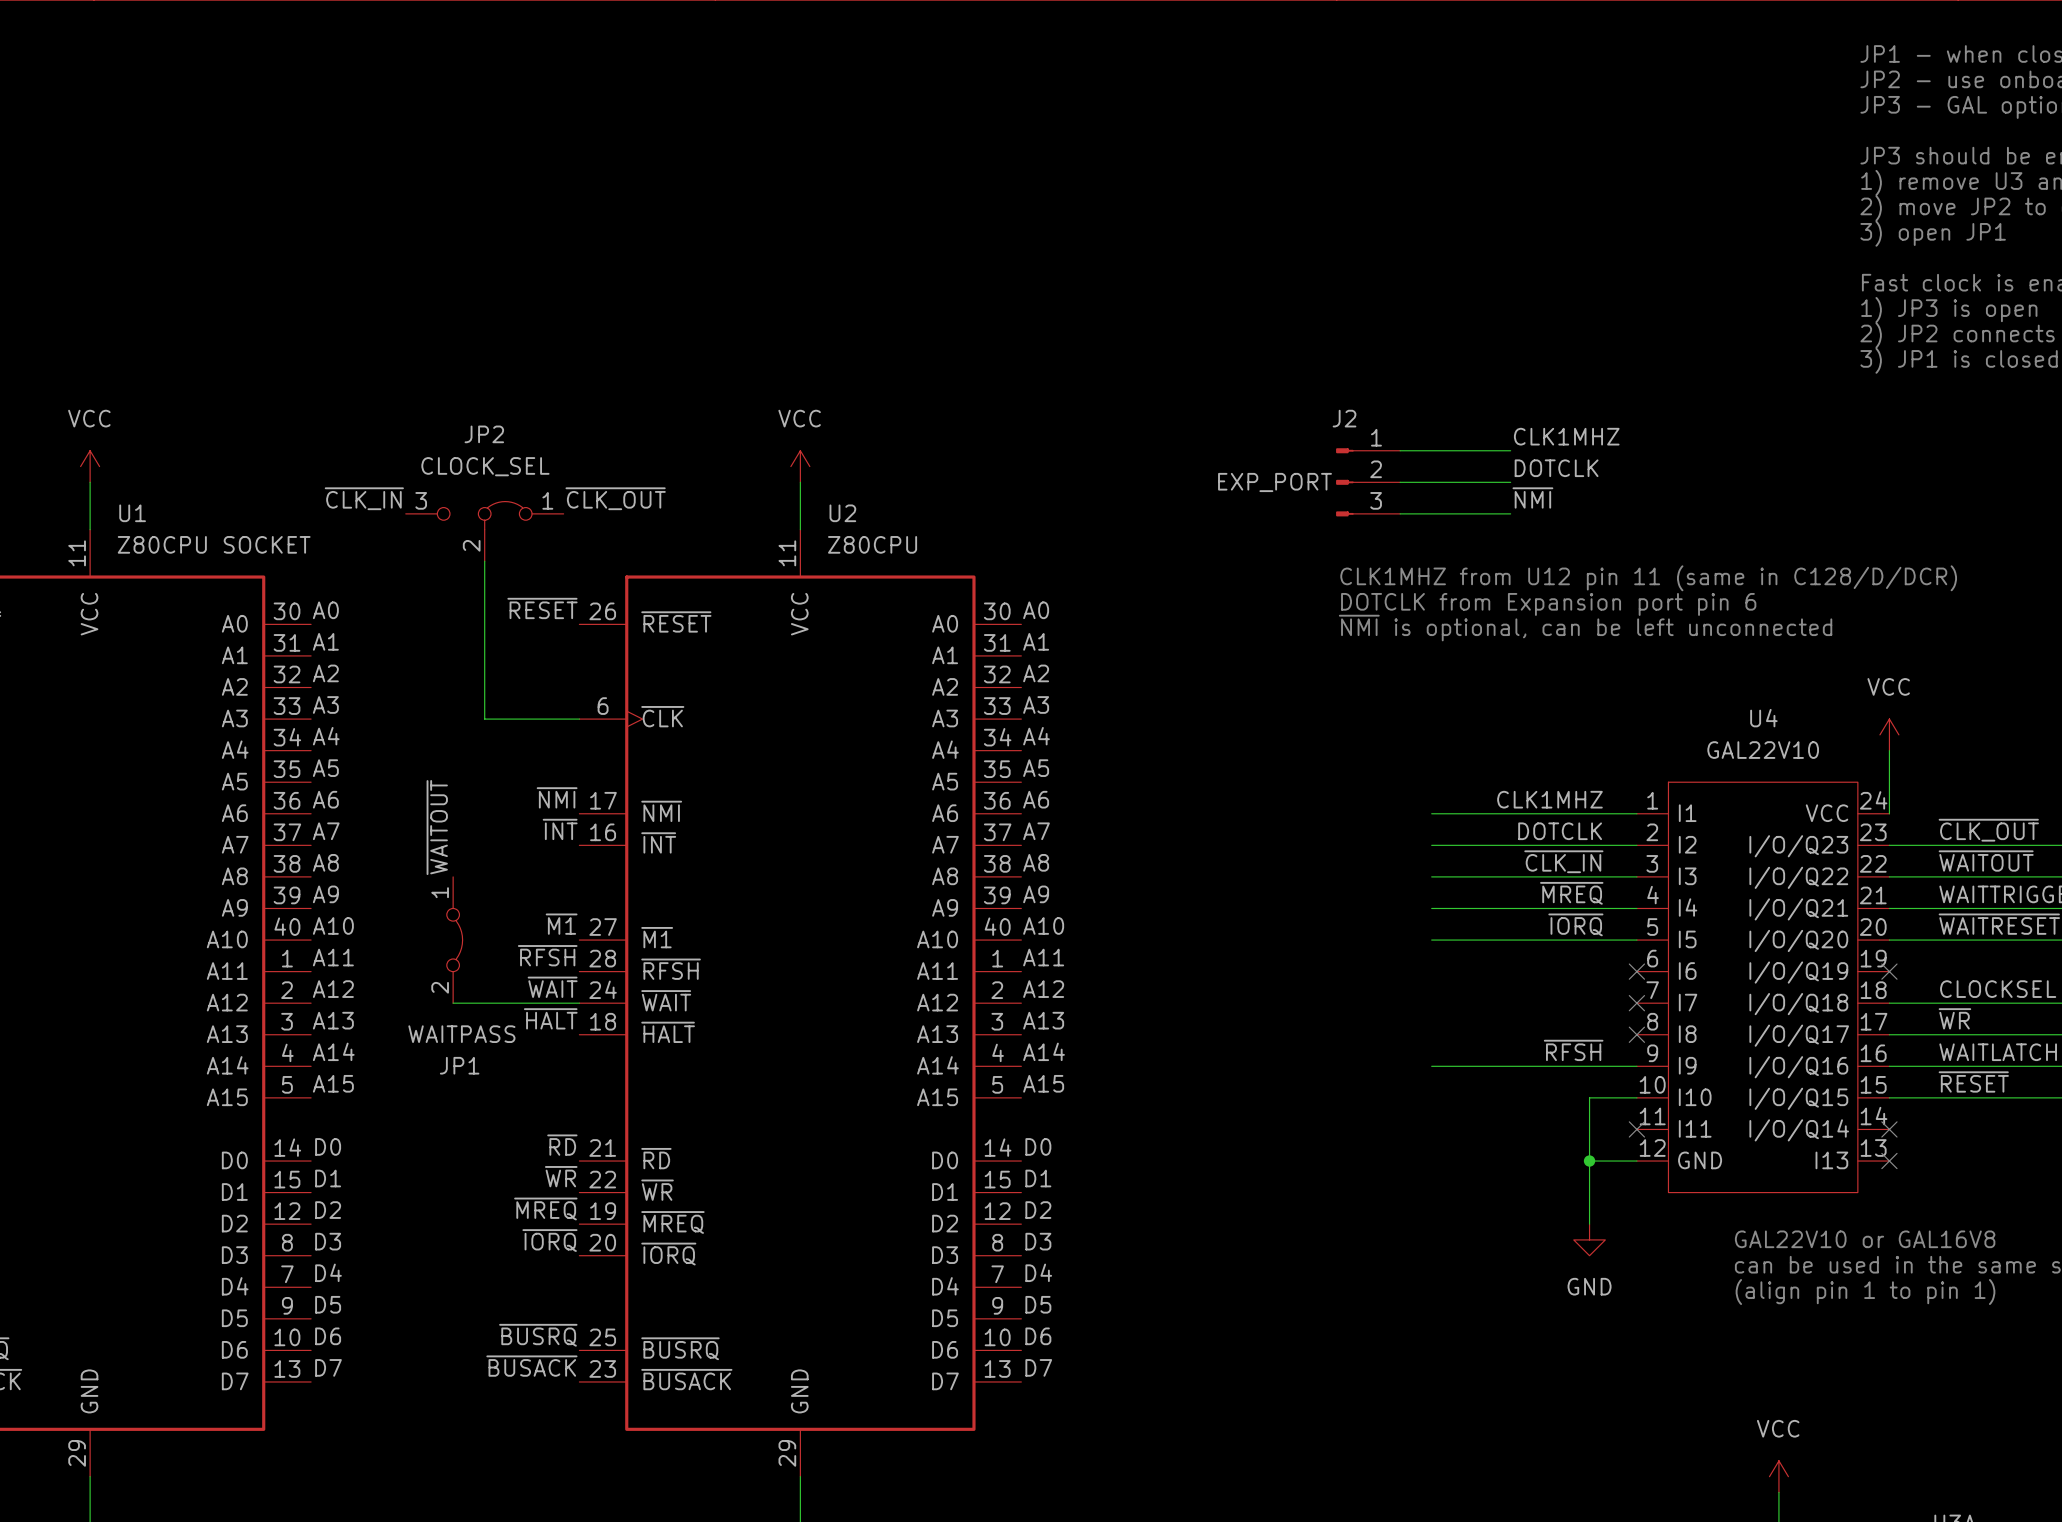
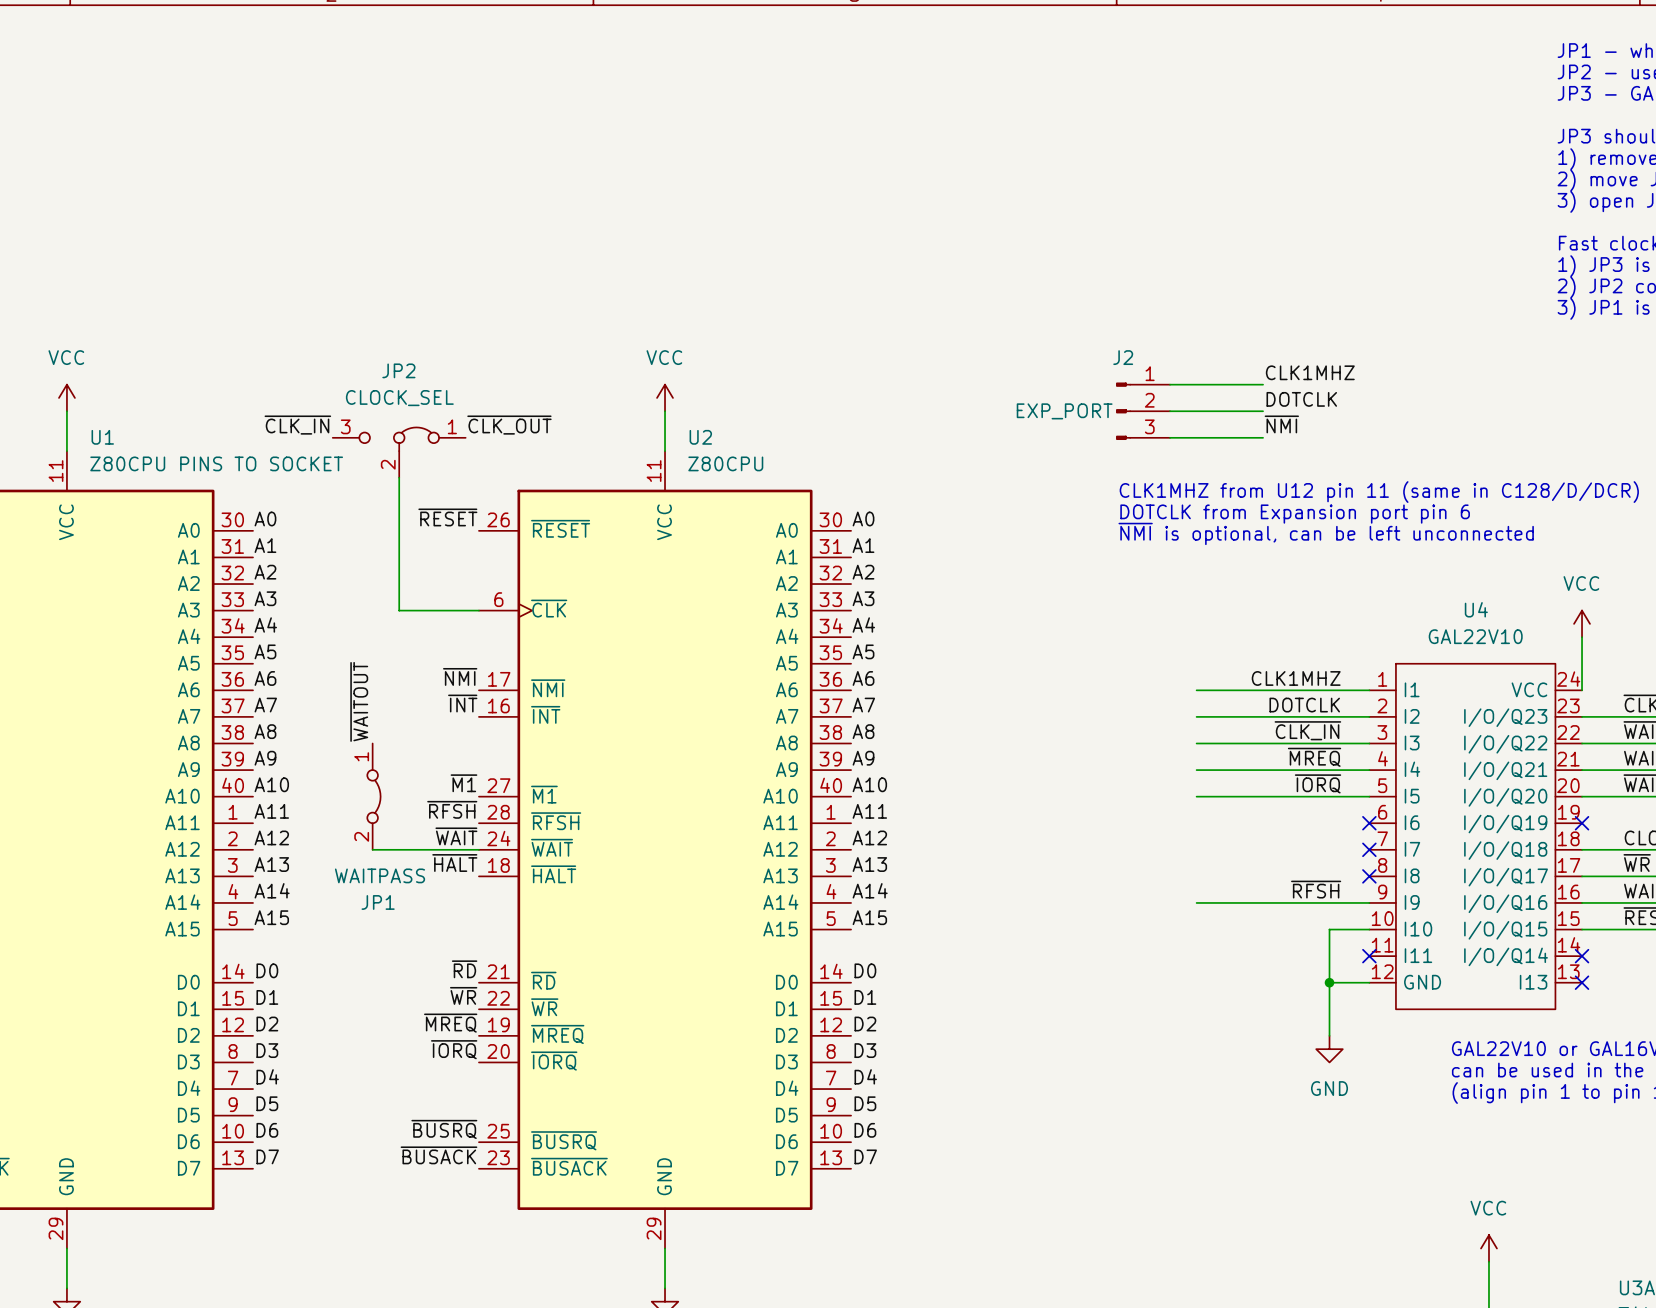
U1 value: Z80CPU SOCKET (214, 544) -> Z80CPU PINS TO SOCKET (216, 463)

